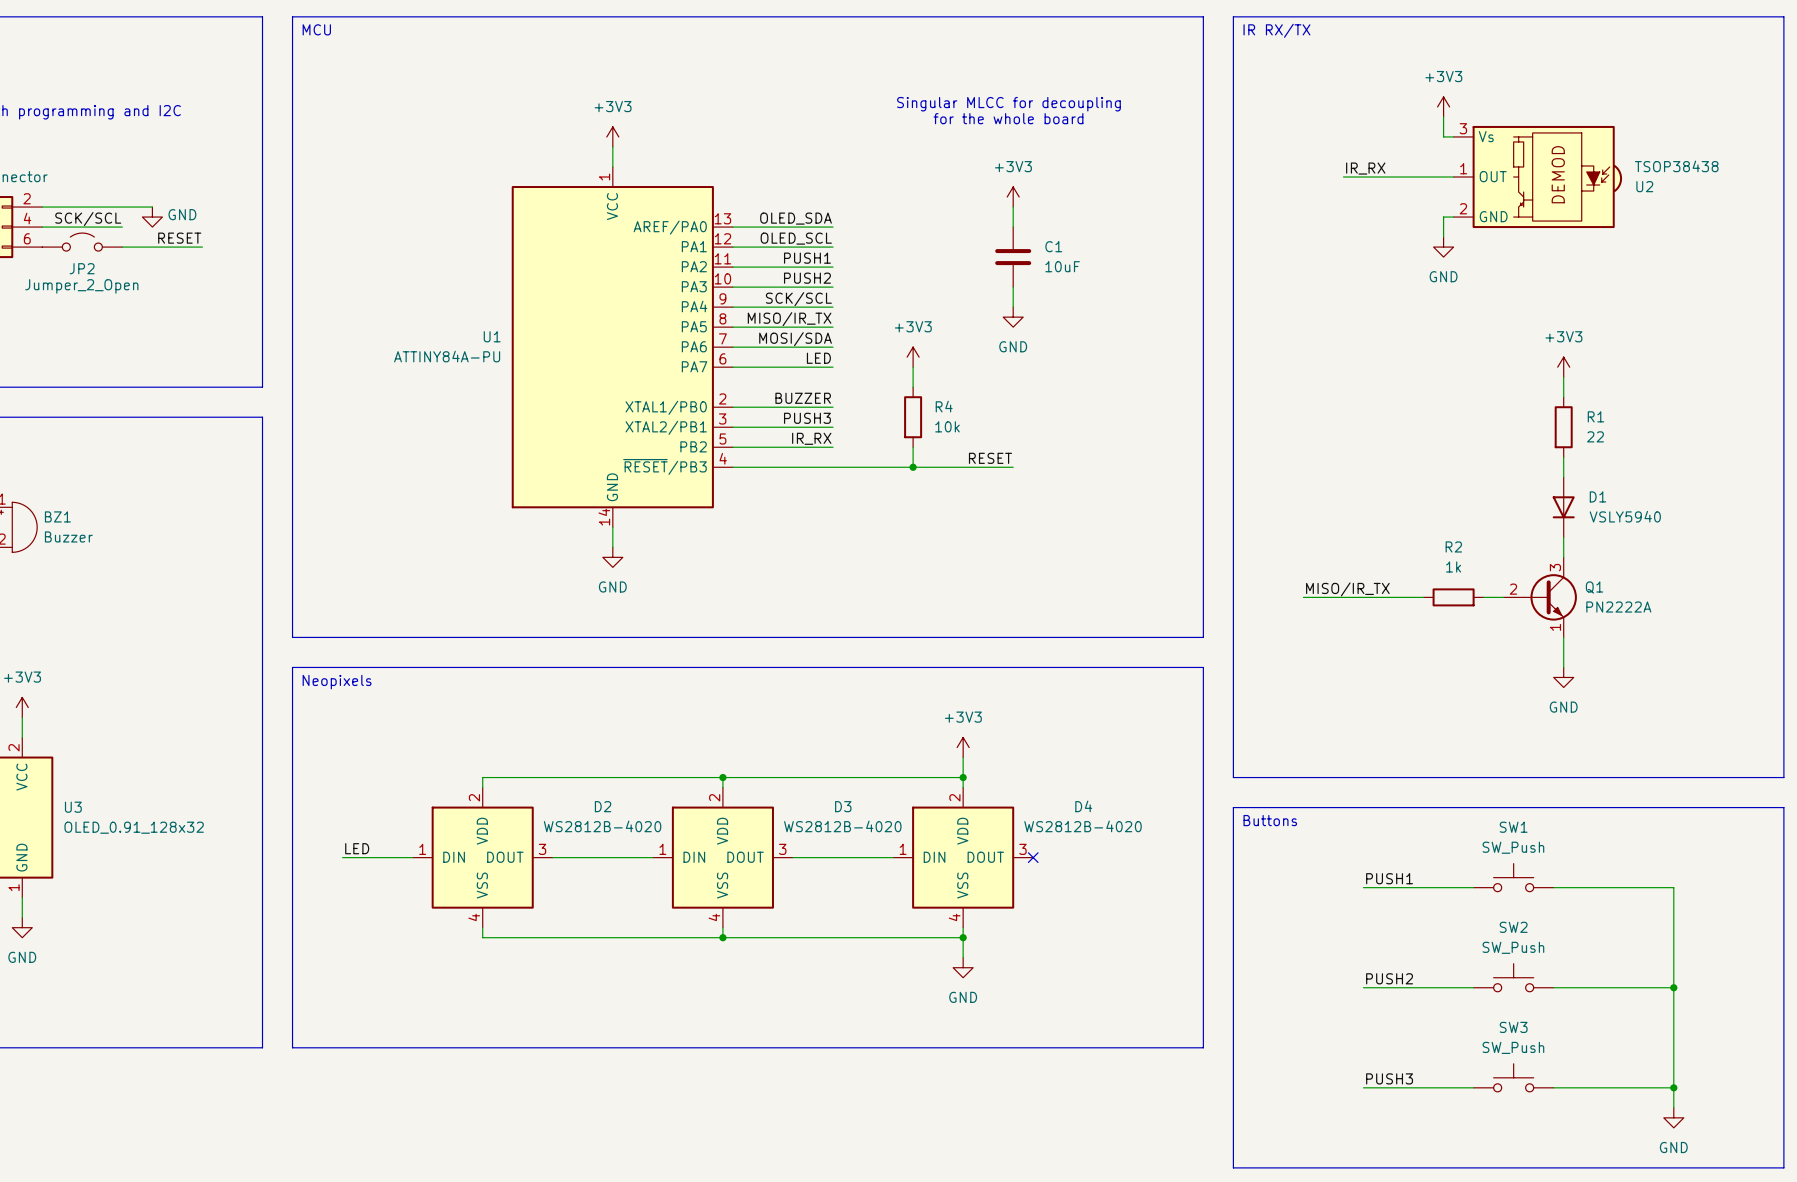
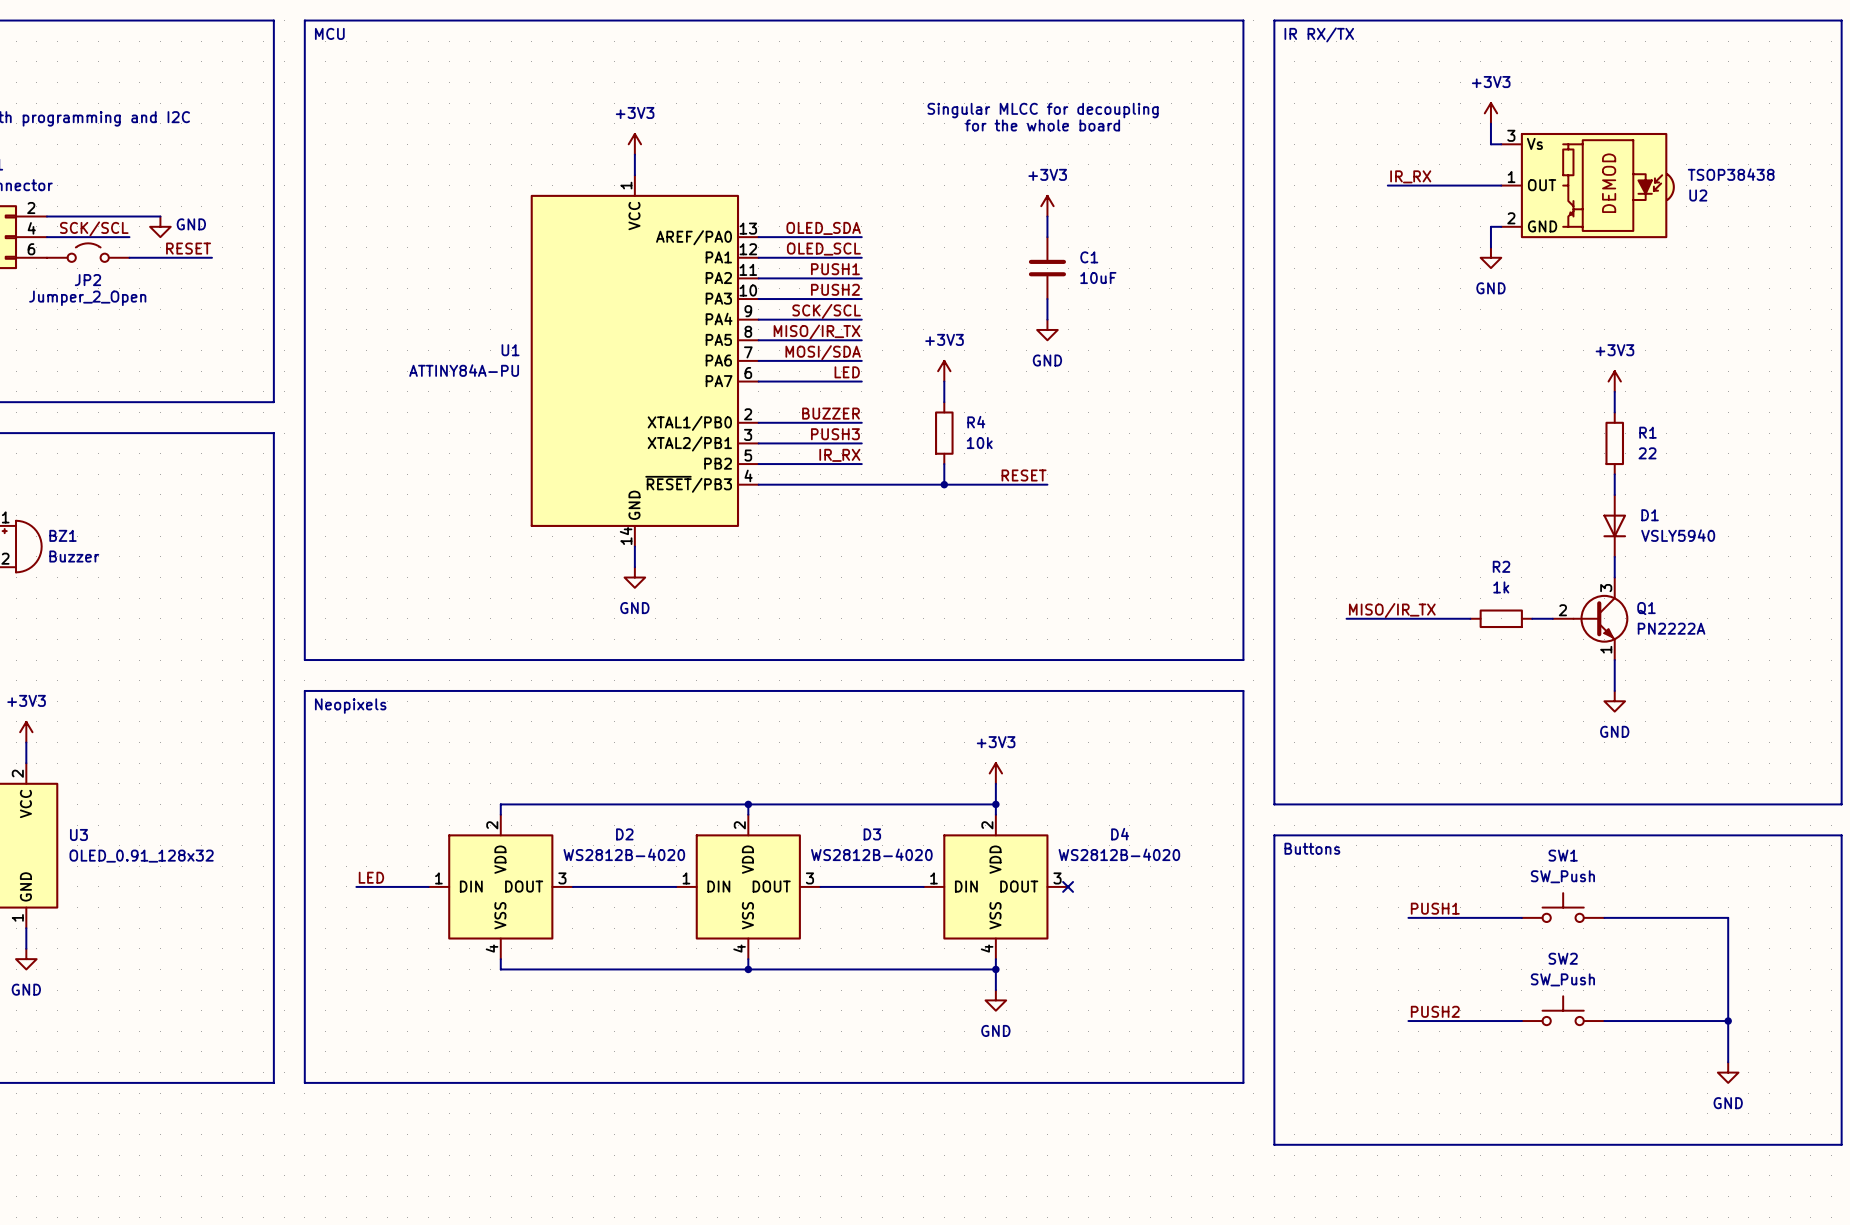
wire: (1673, 1027) (1673, 1107) -> none
SW3: SW_Push (1513, 1077) -> none
label: PUSH3 (1389, 1078) -> none
wire: (1363, 1087) (1473, 1087) -> none
wire: (1553, 1087) (1673, 1087) -> none
junction: (1673, 1087) -> none
line: (1233, 1107) (1233, 1167) (1783, 1167) (1783, 1107) -> (1274, 1144) (1841, 1144)
power symbol position: GND (1673, 1117) -> GND (1728, 1072)

